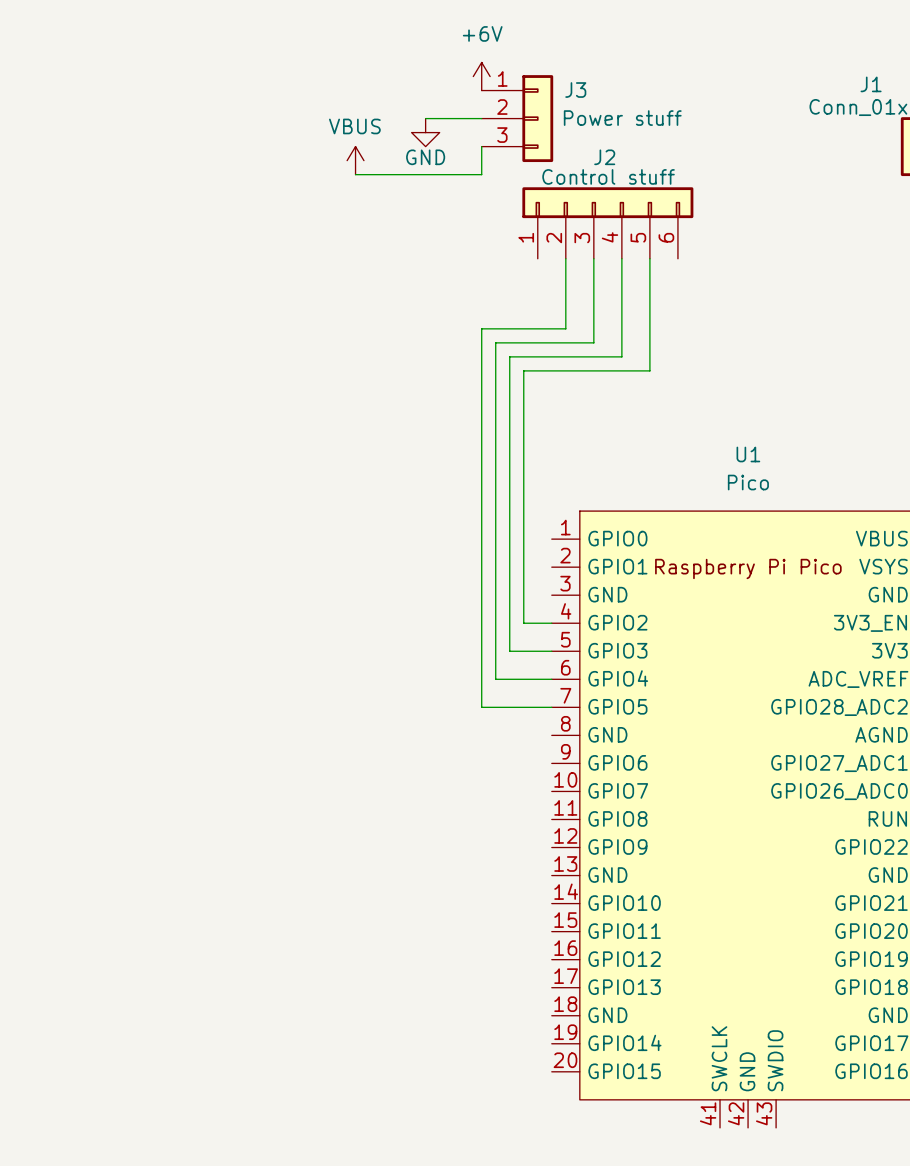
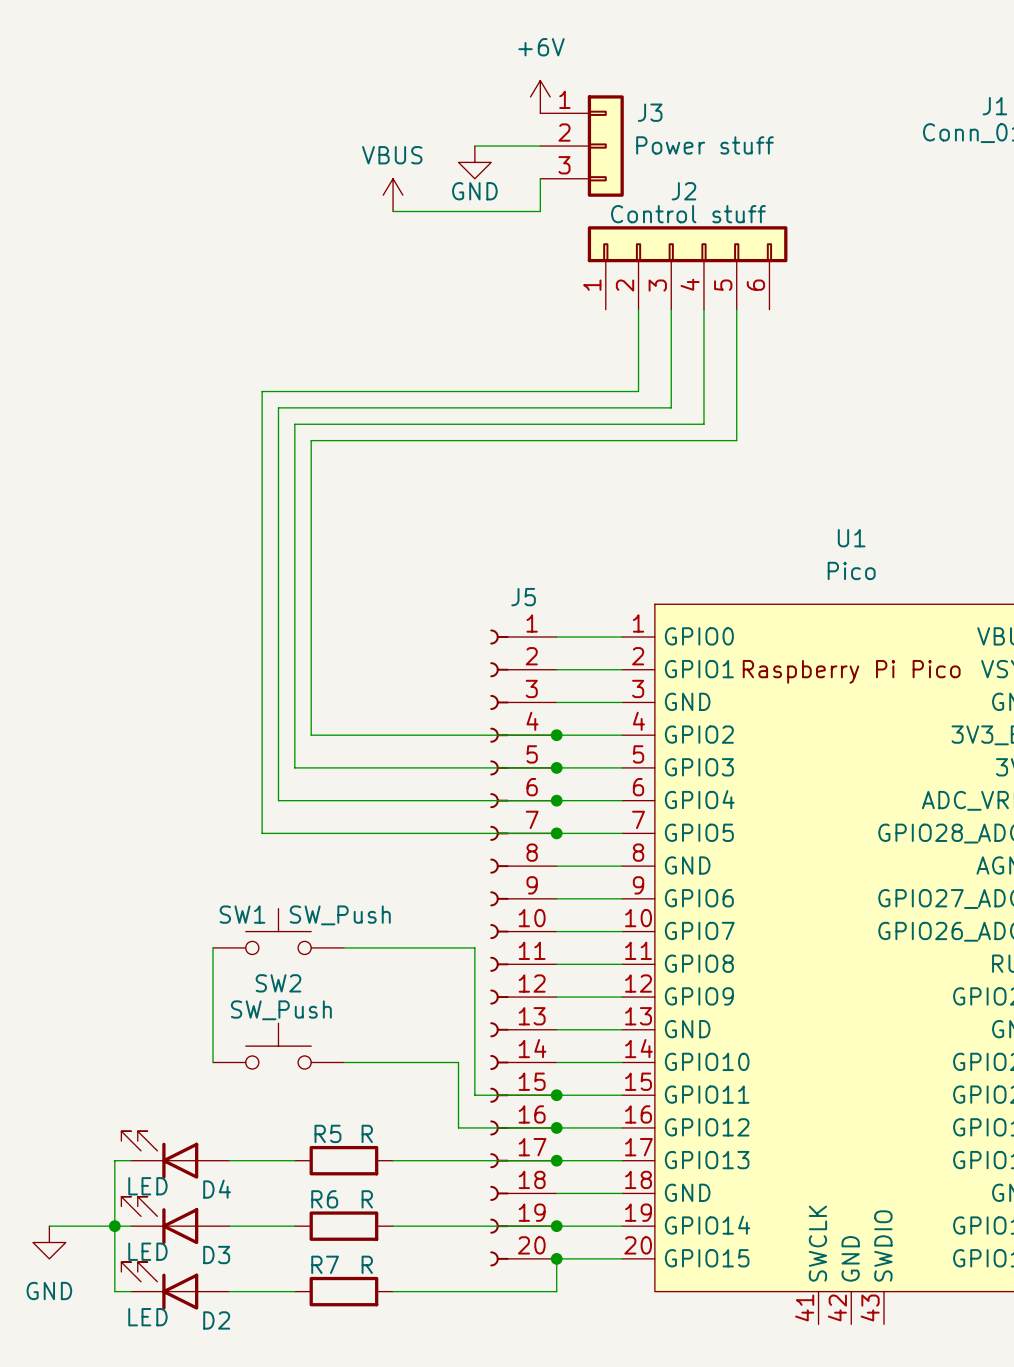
wire: (481, 328) (481, 707) -> (540, 391) (262, 391) (262, 833) (540, 833)
wire: (495, 342) (495, 679) -> (556, 407) (278, 407) (278, 800) (556, 800)
wire: (509, 356) (509, 651) -> (573, 424) (294, 424) (294, 767) (573, 767)
wire: (523, 370) (523, 623) -> (589, 440) (311, 440) (311, 735) (589, 735)
wire: none -> (556, 637) (622, 637)
wire: none -> (556, 669) (622, 669)
wire: none -> (556, 702) (622, 702)
junction: none -> (556, 735)
junction: none -> (556, 767)
junction: none -> (556, 800)
junction: none -> (556, 833)
wire: none -> (556, 866) (622, 866)
wire: none -> (556, 898) (622, 898)
SW1: none -> SW_Push (278, 931)
wire: none -> (556, 931) (622, 931)
wire: none -> (213, 947) (213, 1062)
wire: none -> (343, 947) (474, 947) (474, 1095) (622, 1095)
J5: none -> (523, 947)
wire: none -> (556, 964) (622, 964)
wire: none -> (556, 997) (622, 997)
wire: none -> (556, 1029) (622, 1029)
SW2: none -> SW_Push (278, 1046)
wire: none -> (343, 1062) (458, 1062) (458, 1127) (622, 1127)
wire: none -> (556, 1062) (622, 1062)
junction: none -> (556, 1095)
junction: none -> (556, 1127)
D4: none -> LED (175, 1154)
wire: none -> (131, 1160) (114, 1160) (114, 1291) (131, 1291)
wire: none -> (229, 1160) (294, 1160)
R5: none -> R (343, 1160)
wire: none -> (393, 1160) (622, 1160)
junction: none -> (556, 1160)
wire: none -> (556, 1193) (622, 1193)
D3: none -> LED (175, 1220)
wire: none -> (49, 1226) (131, 1226)
junction: none -> (114, 1226)
wire: none -> (229, 1226) (294, 1226)
R6: none -> R (343, 1226)
wire: none -> (393, 1226) (622, 1226)
junction: none -> (556, 1226)
power symbol: none -> GND (49, 1242)
junction: none -> (556, 1258)
wire: none -> (622, 1258) (556, 1258) (556, 1291) (393, 1291)
D2: none -> LED (175, 1285)
wire: none -> (229, 1291) (294, 1291)
R7: none -> R (343, 1291)

